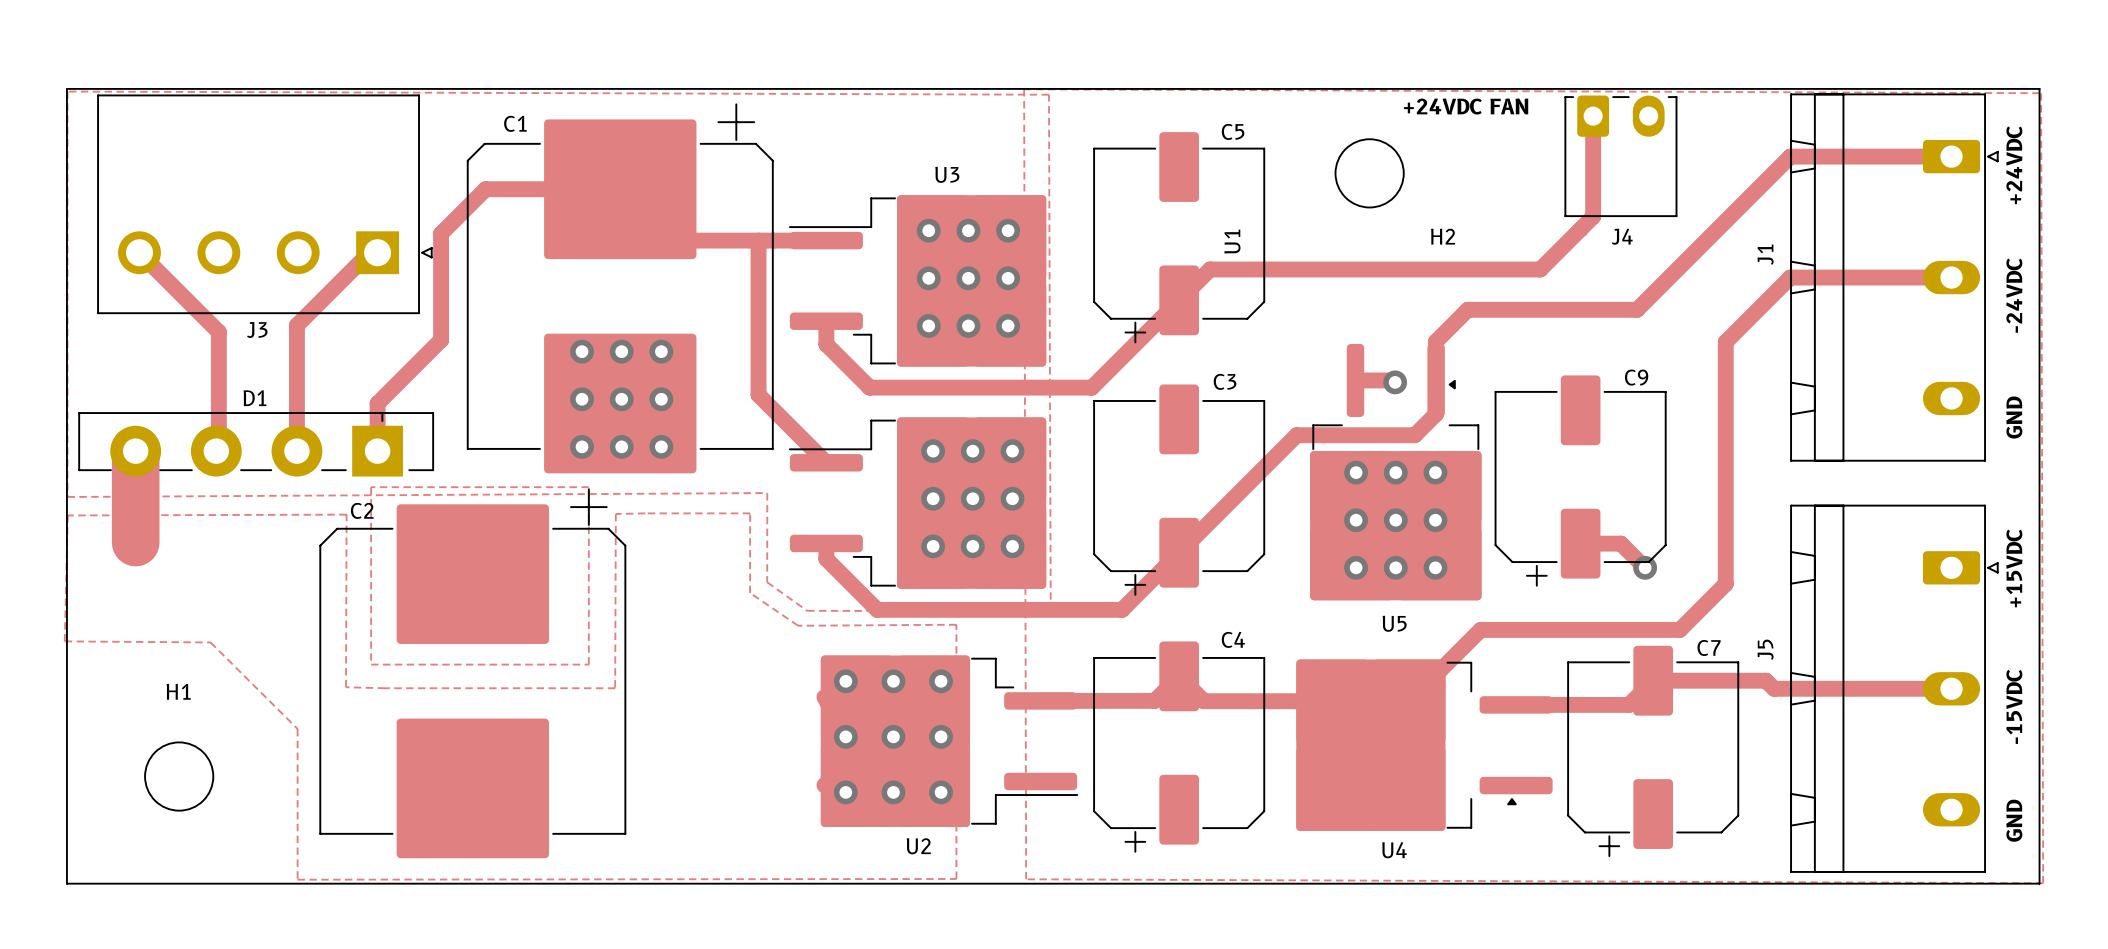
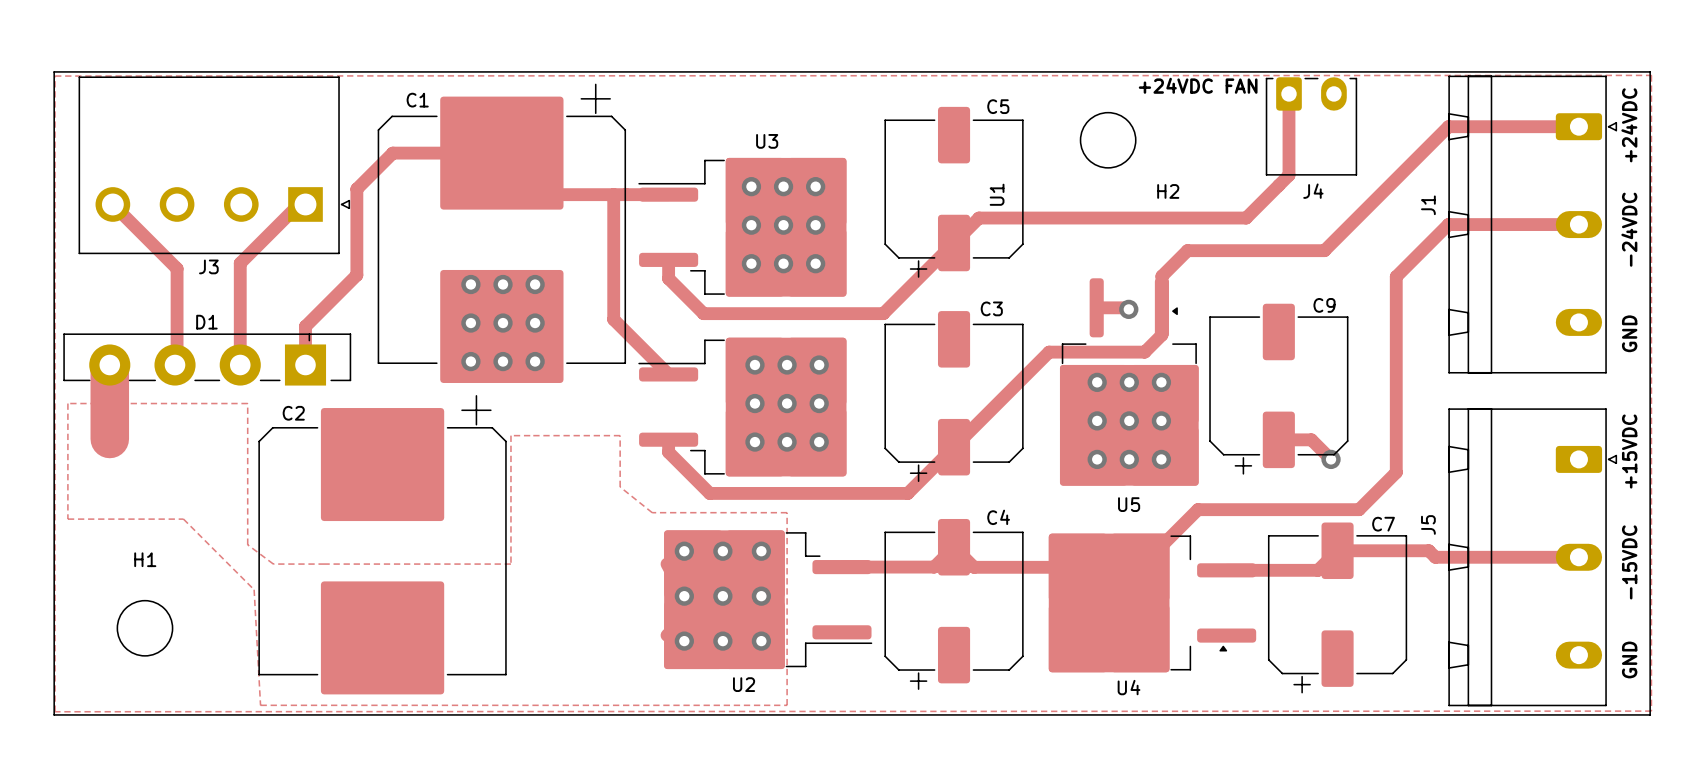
zone outline: (1024, 89) (2041, 93) (2043, 883) (1026, 879) (1024, 89) -> (1651, 75) (55, 76) (55, 711) (1651, 711) (1651, 75)
zone outline: (67, 91) (67, 496) (767, 493) (767, 582) (807, 610) (1050, 611) (1048, 94) (67, 91) -> none
zone outline: (371, 487) (371, 664) (588, 664) (588, 487) (371, 487) -> none
zone outline: (645, 513) (750, 513) (750, 593) (798, 625) (956, 624) (956, 878) (297, 879) (297, 728) (210, 642) (64, 641) (67, 515) (346, 514) (346, 687) (615, 688) (615, 514) (645, 513) -> (67, 403) (67, 519) (183, 519) (254, 589) (260, 705) (787, 705) (787, 512) (652, 512) (620, 487) (620, 435) (510, 435) (510, 564) (273, 564) (247, 544) (247, 403) (67, 403)

